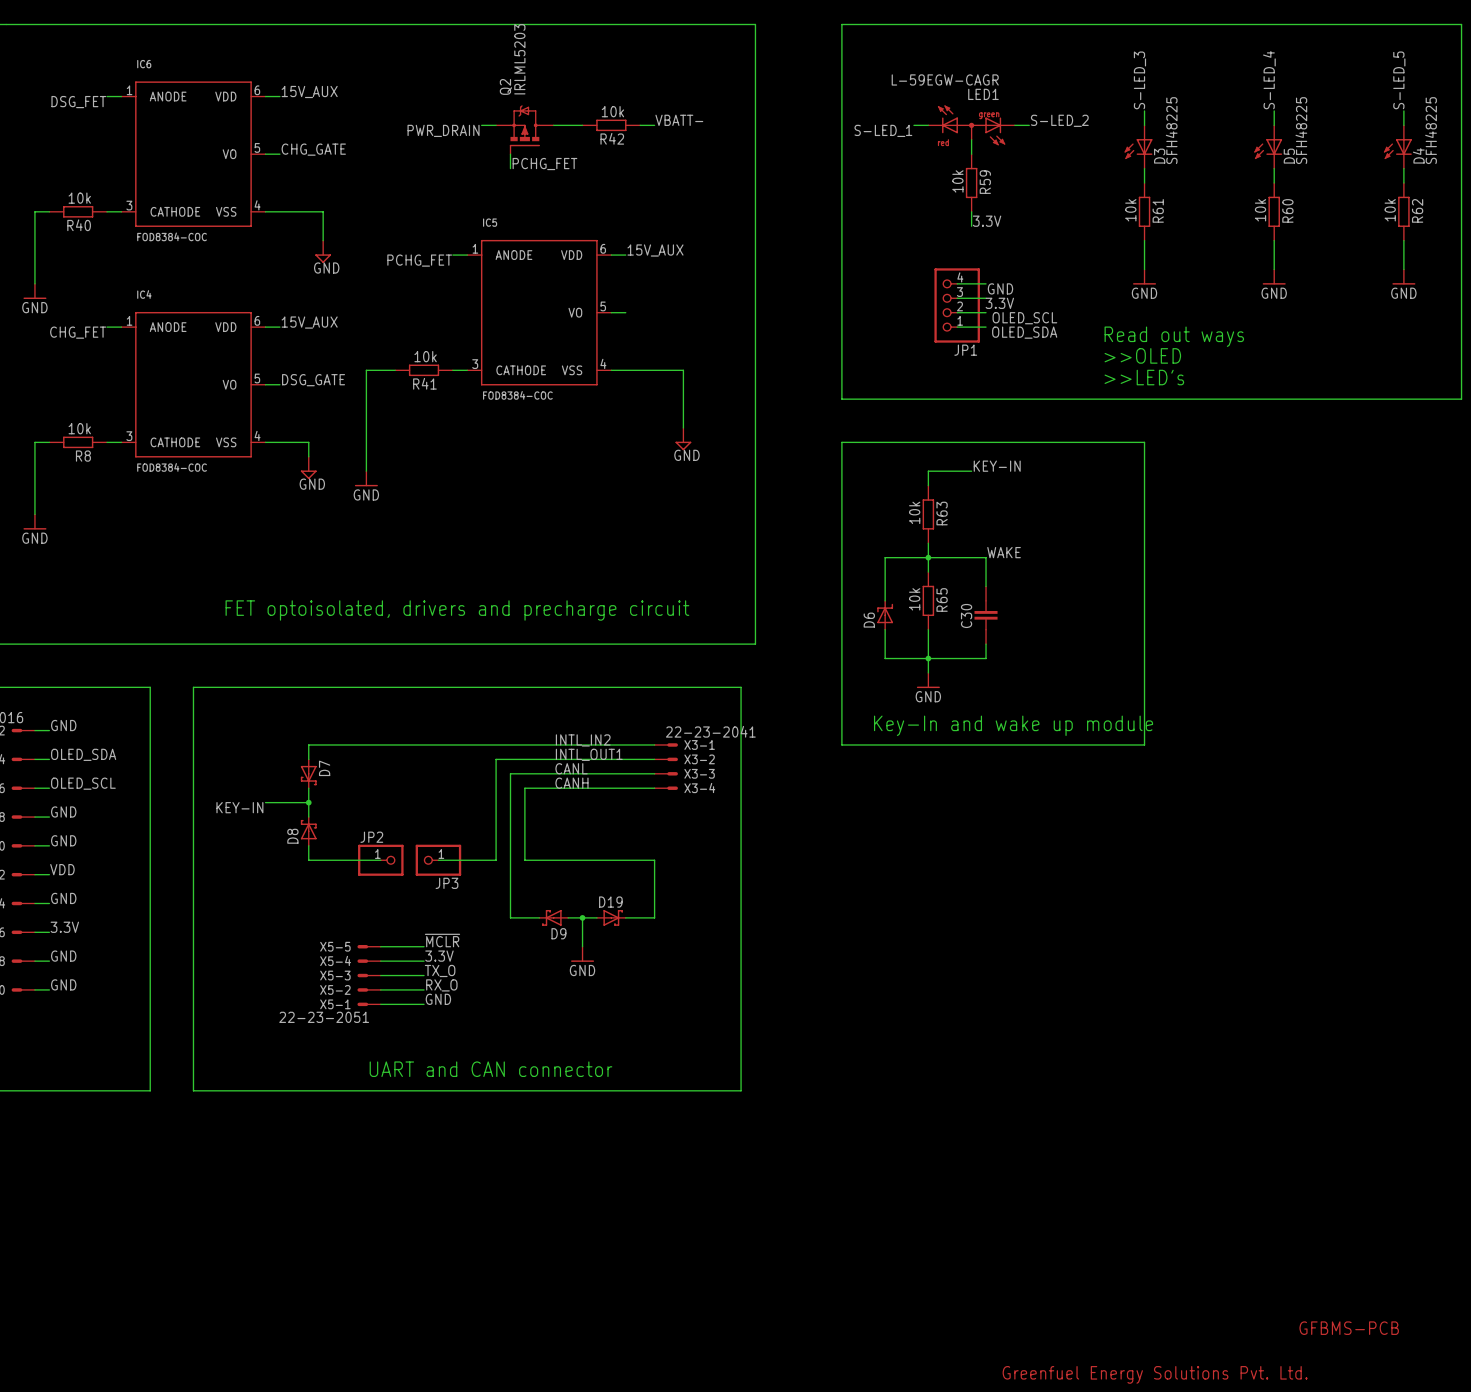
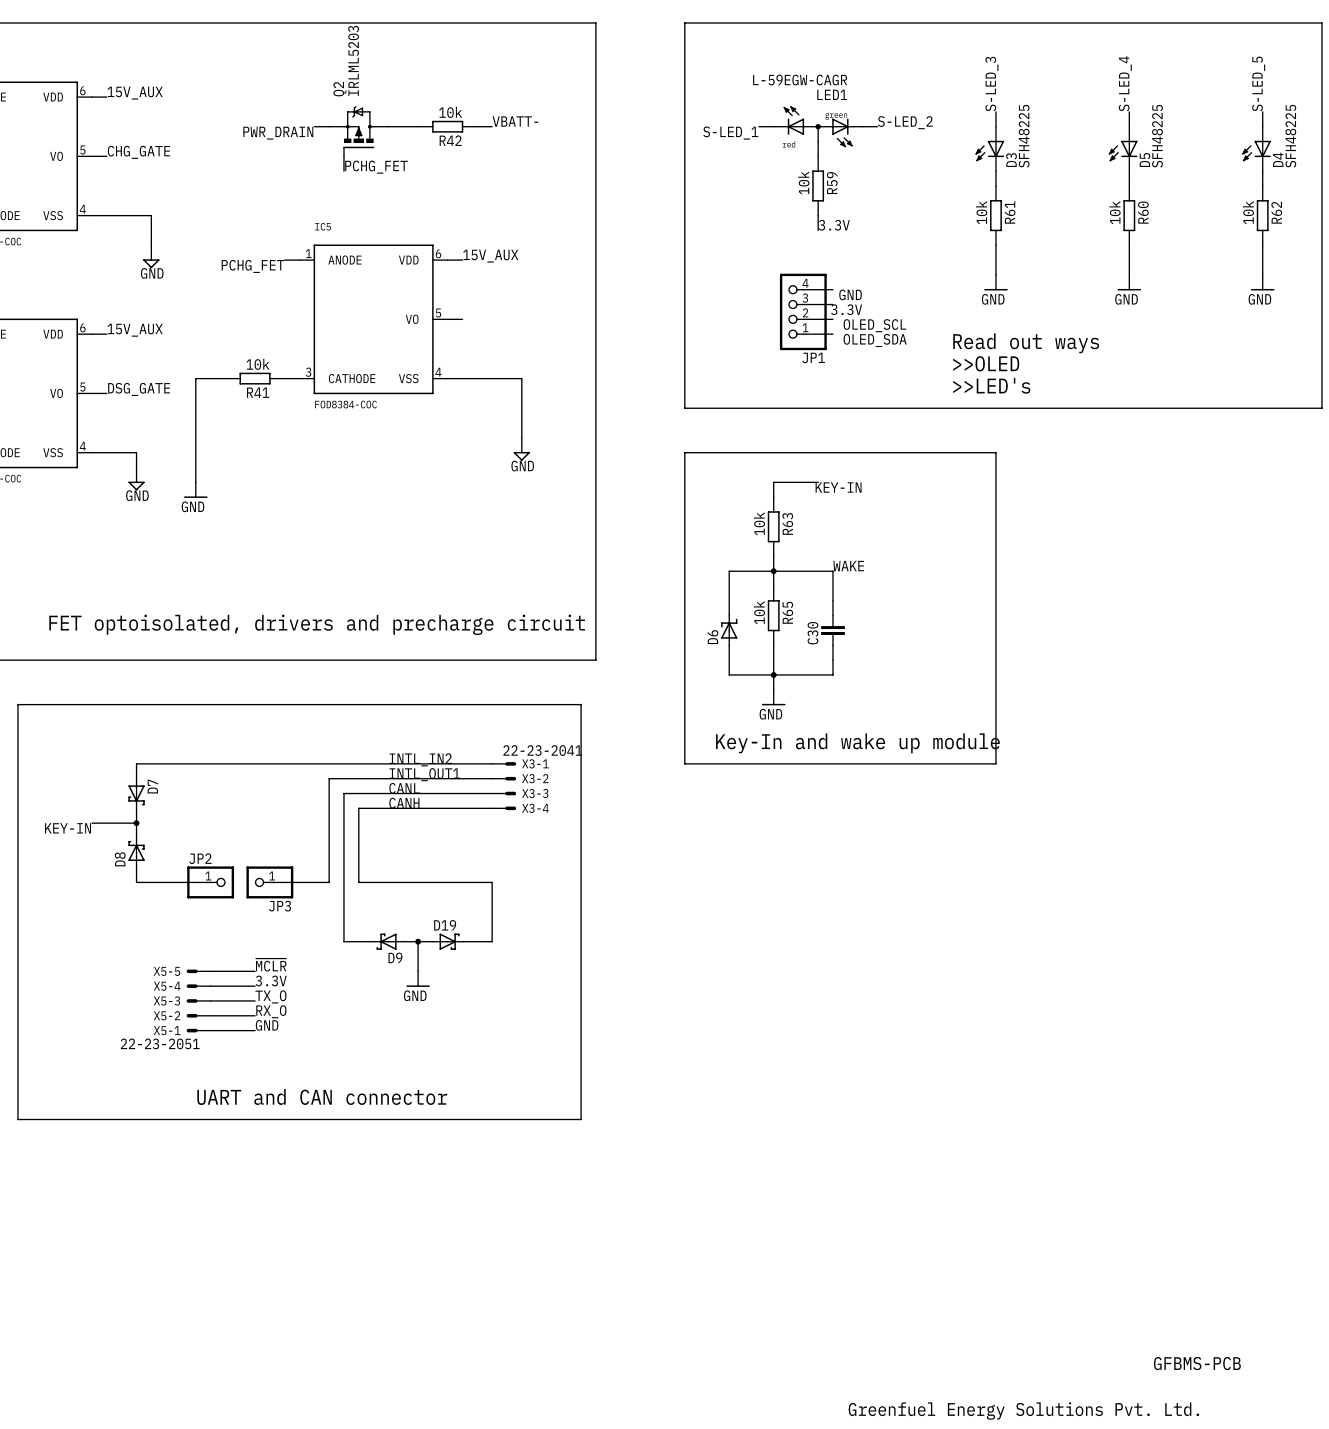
label position: KEY-IN (997, 466) -> KEY-IN (838, 487)

